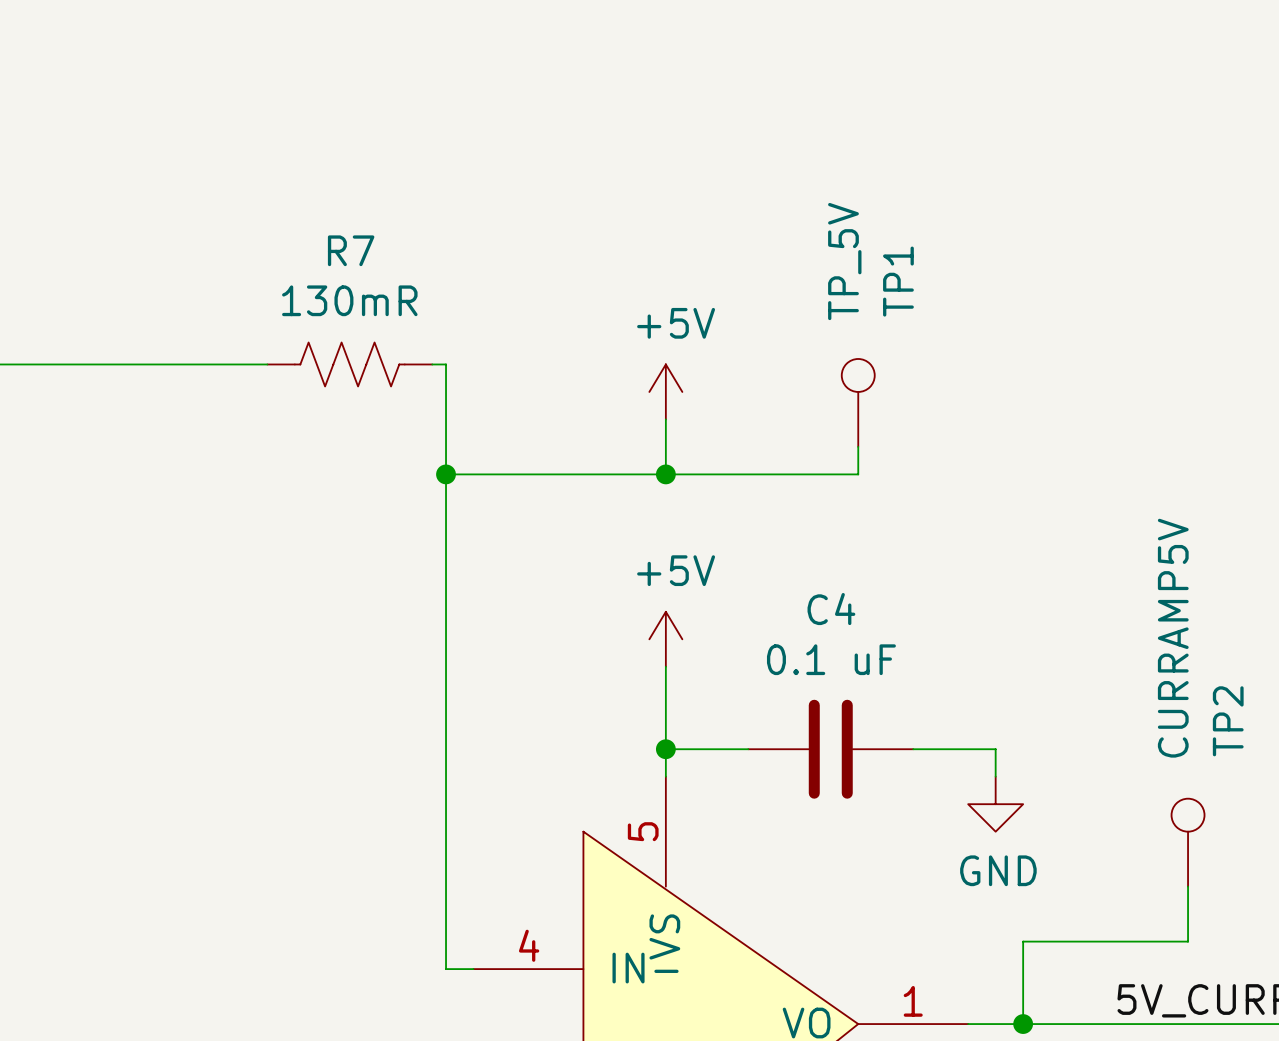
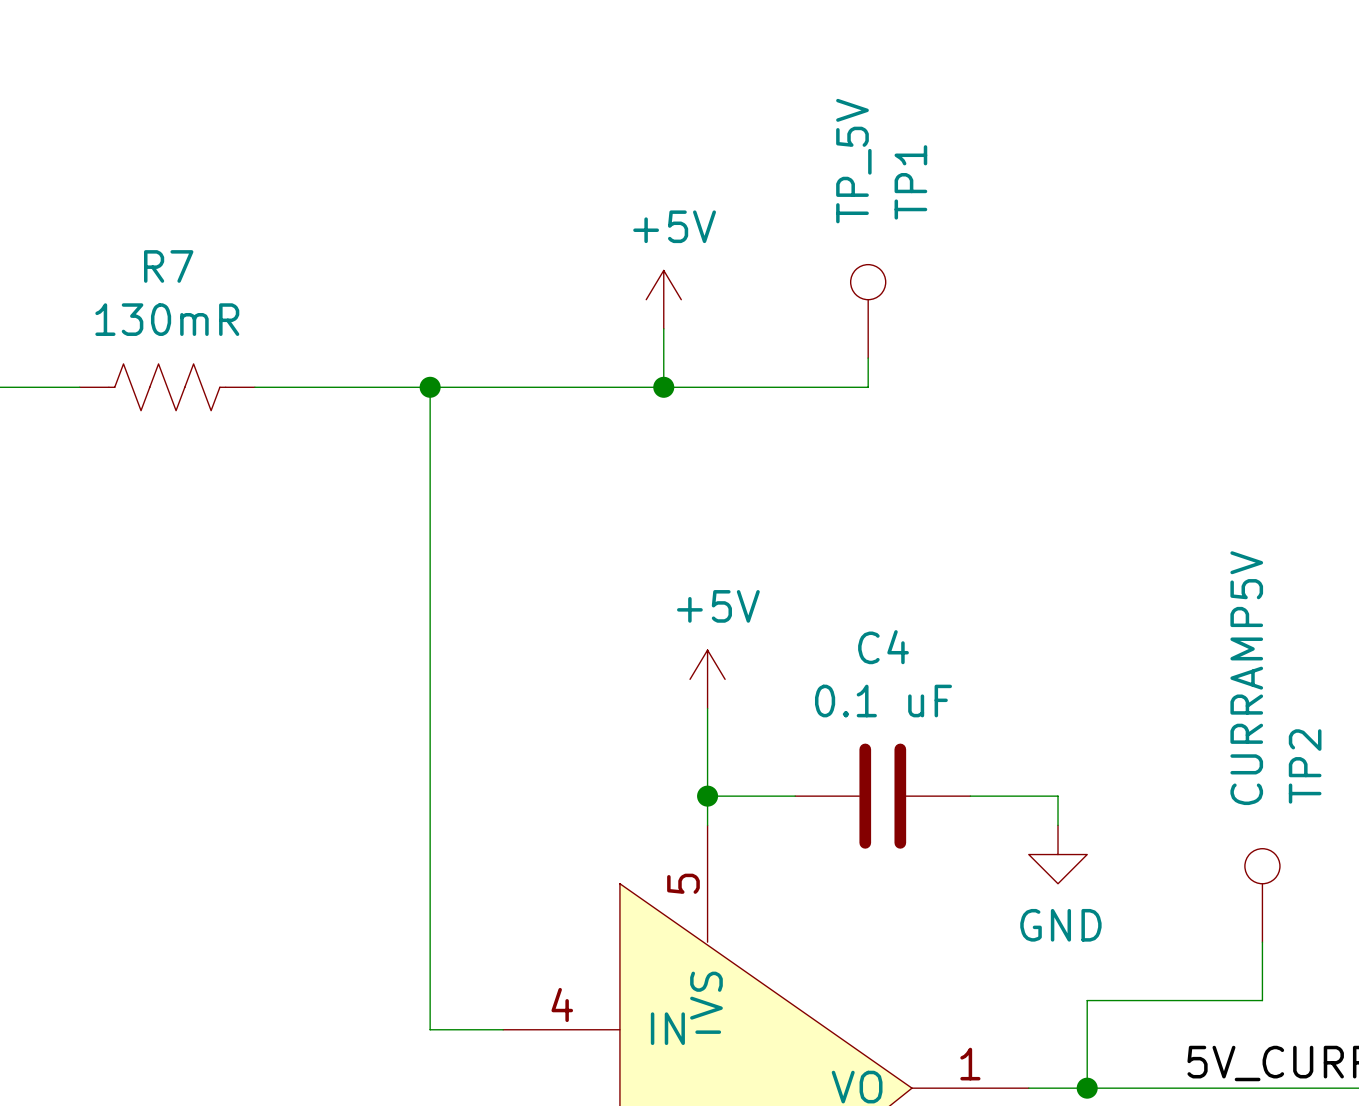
wire: none -> (868, 358) (868, 387) (473, 387)
wire: (75, 364) (239, 364) -> (284, 387) (459, 387)
R7 position: (349, 364) -> (167, 387)
junction: none -> (430, 387)
wire: (446, 364) (446, 969) -> (430, 387) (430, 1029) (473, 1029)
junction: none -> (663, 387)
power symbol position: +5V (665, 391) -> +5V (663, 299)
TP1 position: (858, 402) -> (868, 311)
wire: (665, 419) (665, 474) -> (663, 328) (663, 387)
wire: (858, 446) (858, 474) (446, 474) -> none
junction: (446, 474) -> none
junction: (665, 474) -> none

